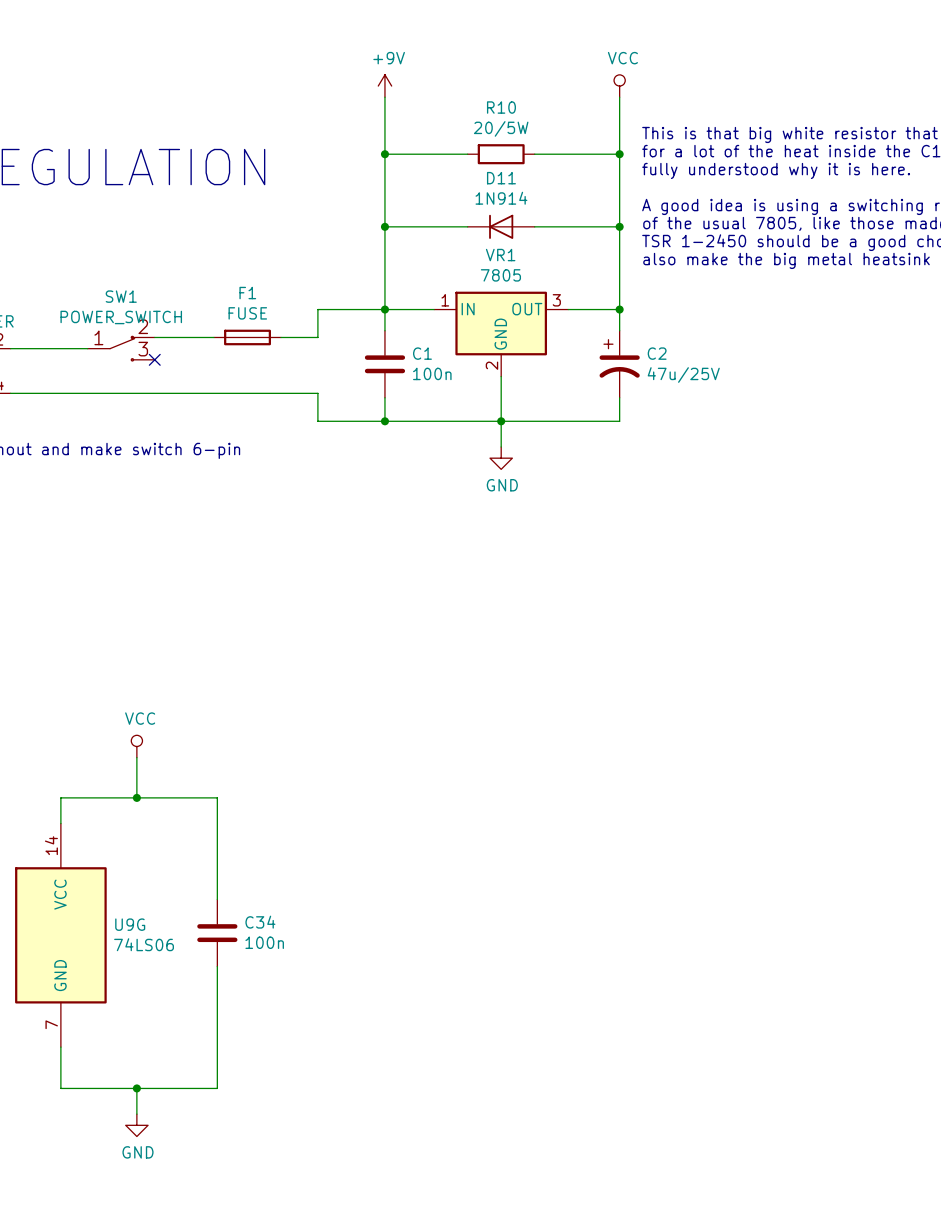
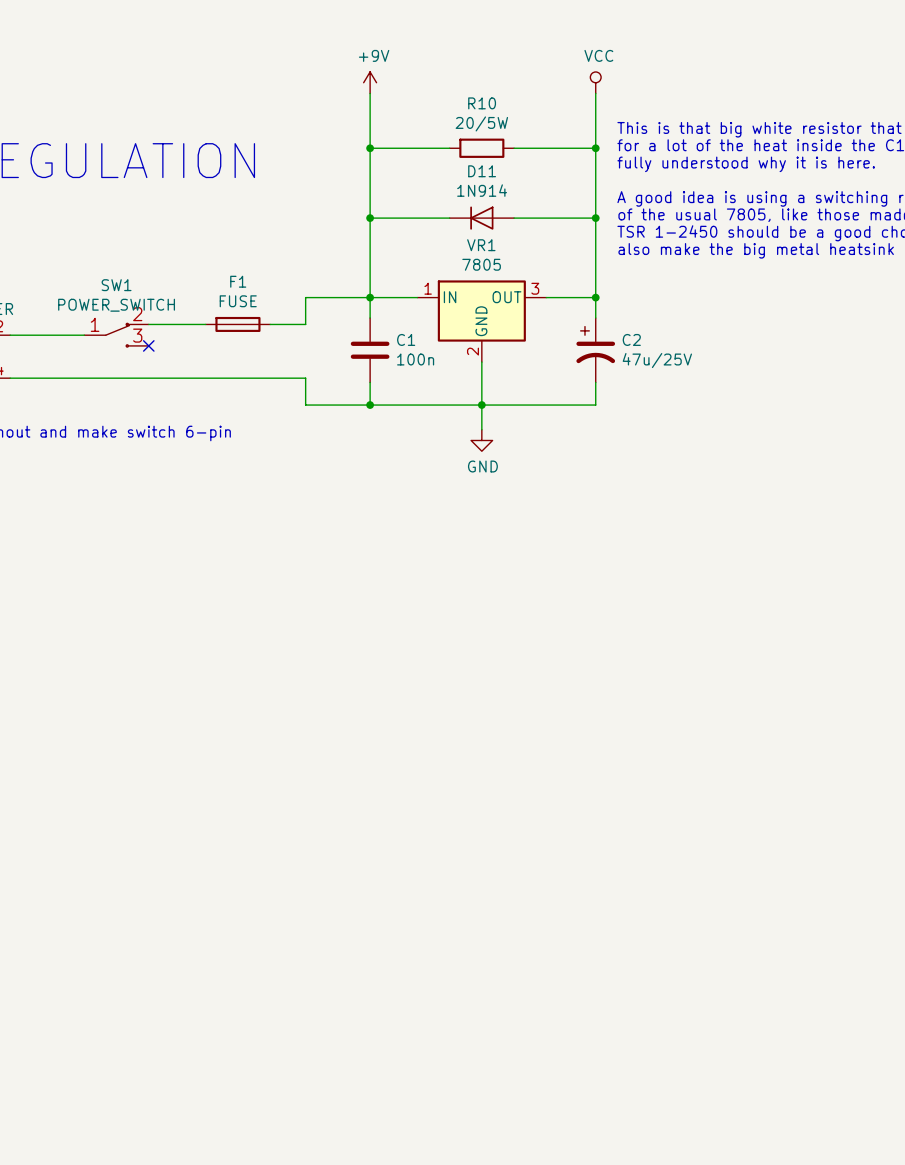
power symbol: VCC (136, 746) -> none
wire: (136, 757) (136, 797) -> none
junction: (136, 797) -> none
wire: (60, 823) (60, 797) (217, 797) (217, 899) -> none
C34: 100n (217, 933) -> none
U9G: 74LS06 (60, 935) -> none
wire: (217, 966) (217, 1088) (60, 1088) (60, 1047) -> none
wire: (136, 1088) (136, 1114) -> none
junction: (136, 1088) -> none
power symbol: GND (136, 1125) -> none

